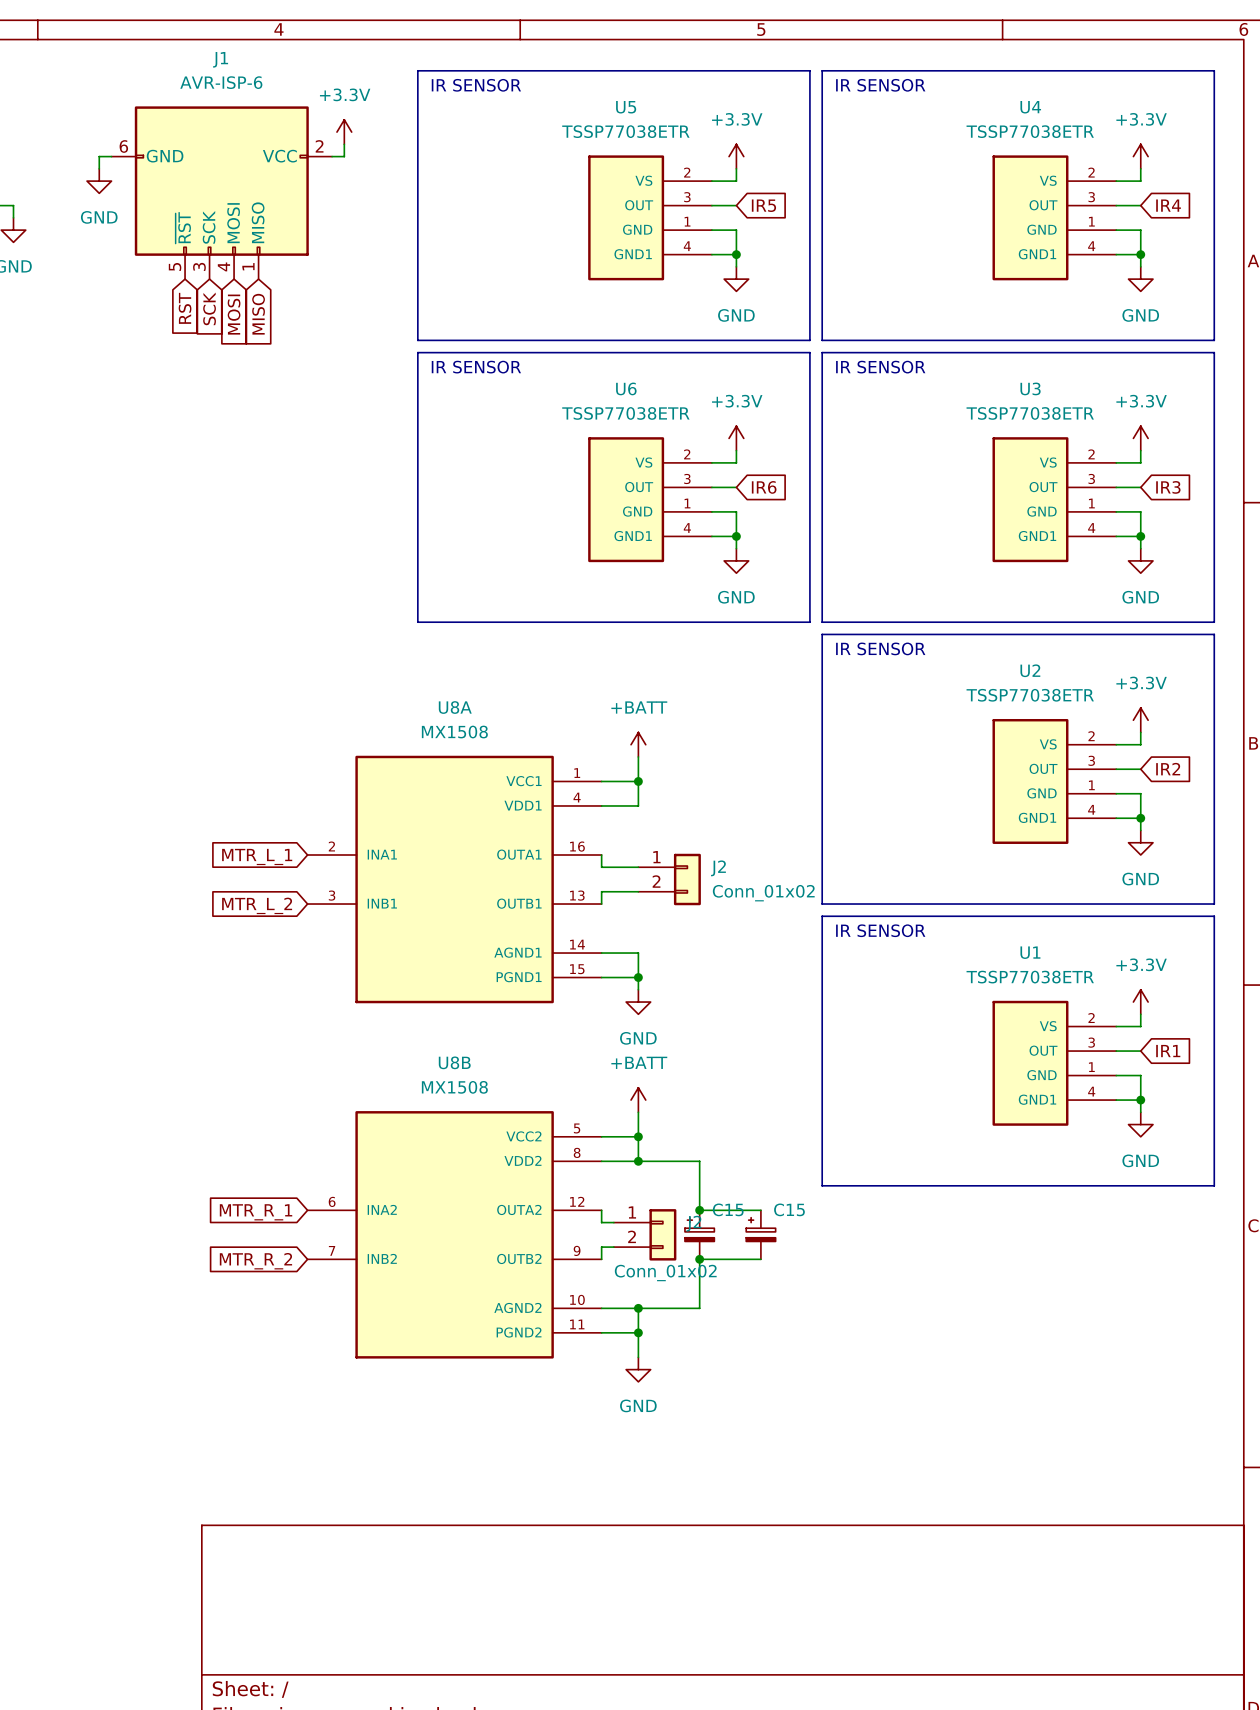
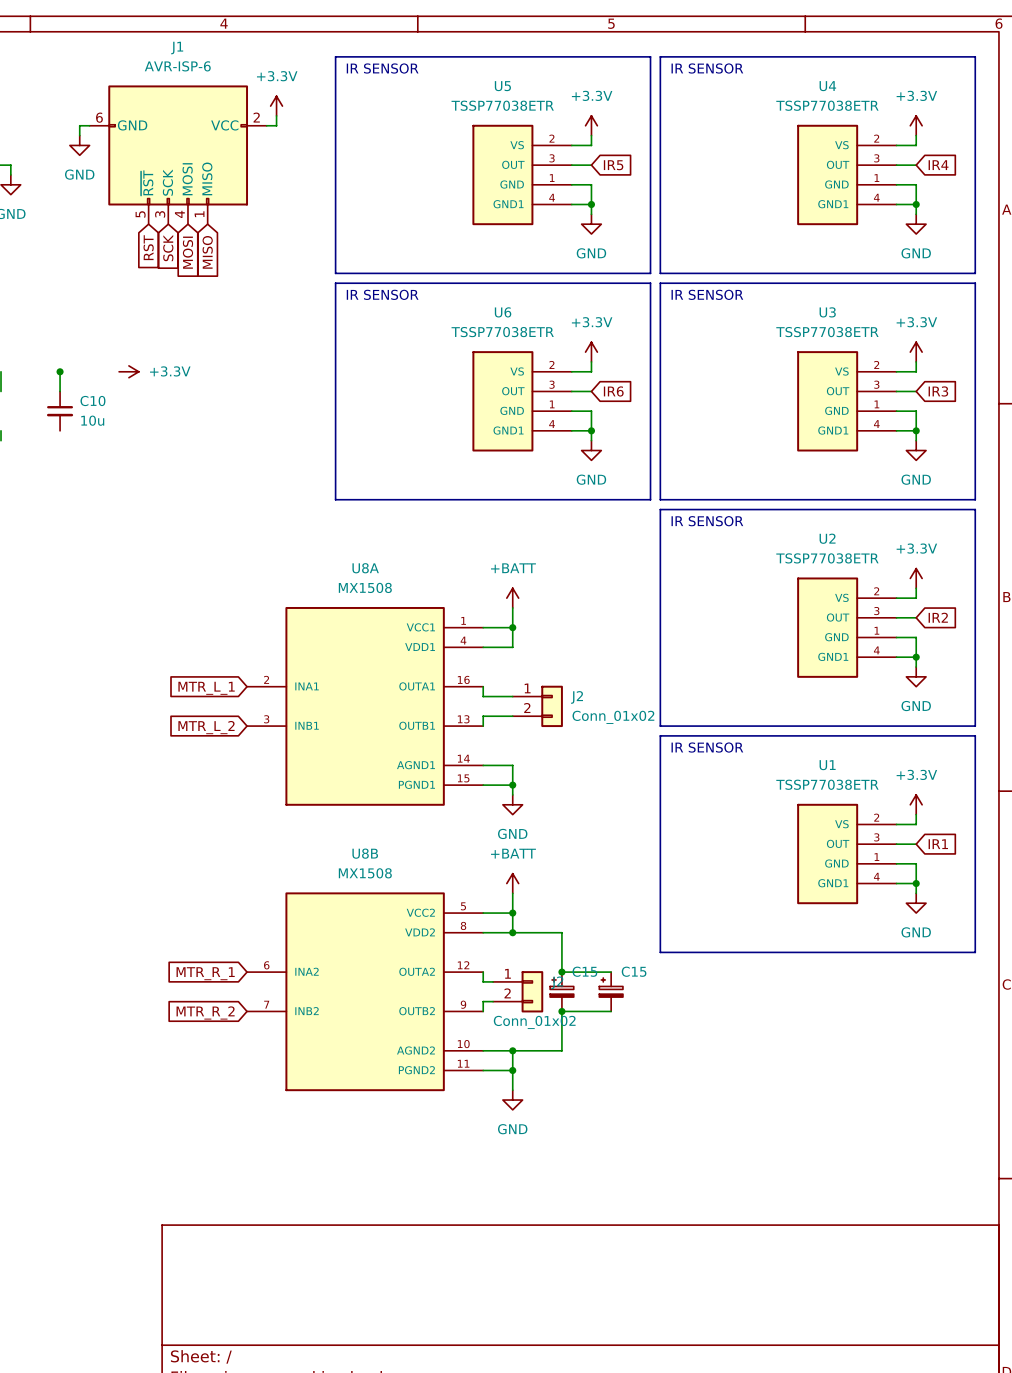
wire: none -> (1, 371) (1, 391)
wire: none -> (60, 371) (60, 391)
junction: none -> (60, 371)
power symbol: none -> +3.3V (128, 371)
C10: none -> 10u (60, 411)
wire: none -> (1, 430) (1, 440)

